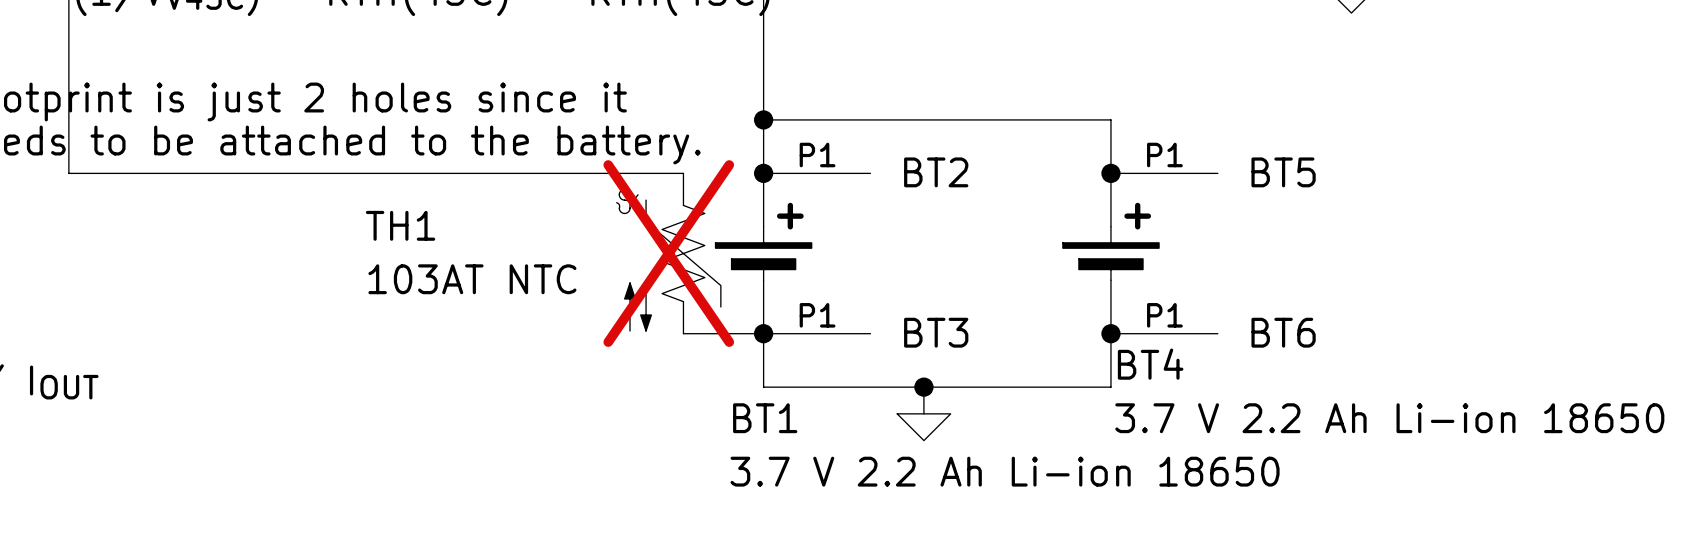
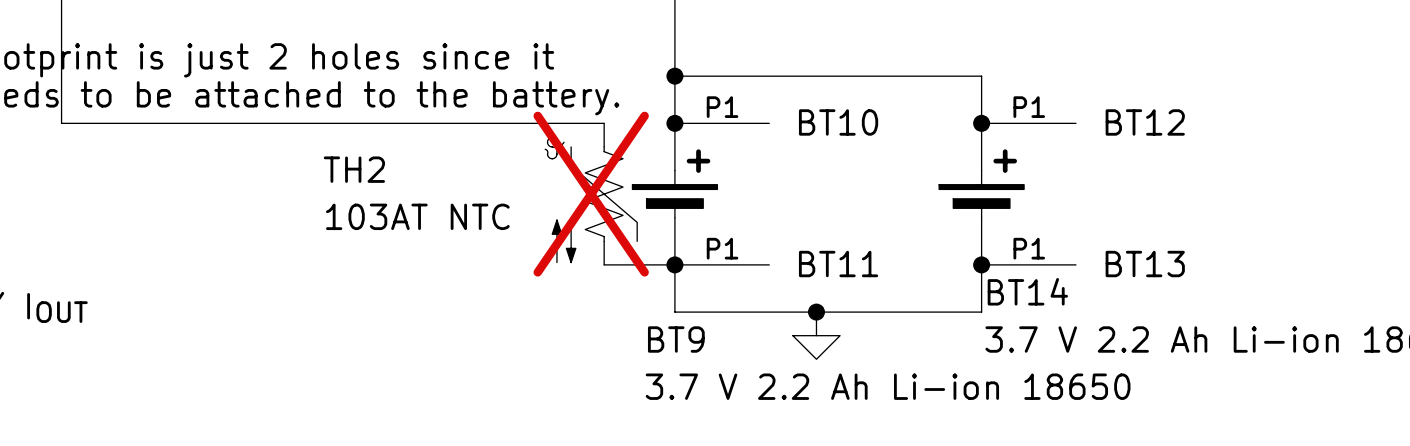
BT2 name: BT2 (936, 172) -> BT10 (838, 122)
BT5 name: BT5 (1283, 172) -> BT12 (1145, 122)
TH1 name: TH1 (400, 225) -> TH2 (354, 169)
BT3 name: BT3 (936, 332) -> BT11 (838, 264)
BT6 name: BT6 (1283, 332) -> BT13 (1145, 264)
BT4 name: BT4 (1150, 364) -> BT14 (1027, 291)
BT1 name: BT1 (765, 418) -> BT9 (676, 339)

